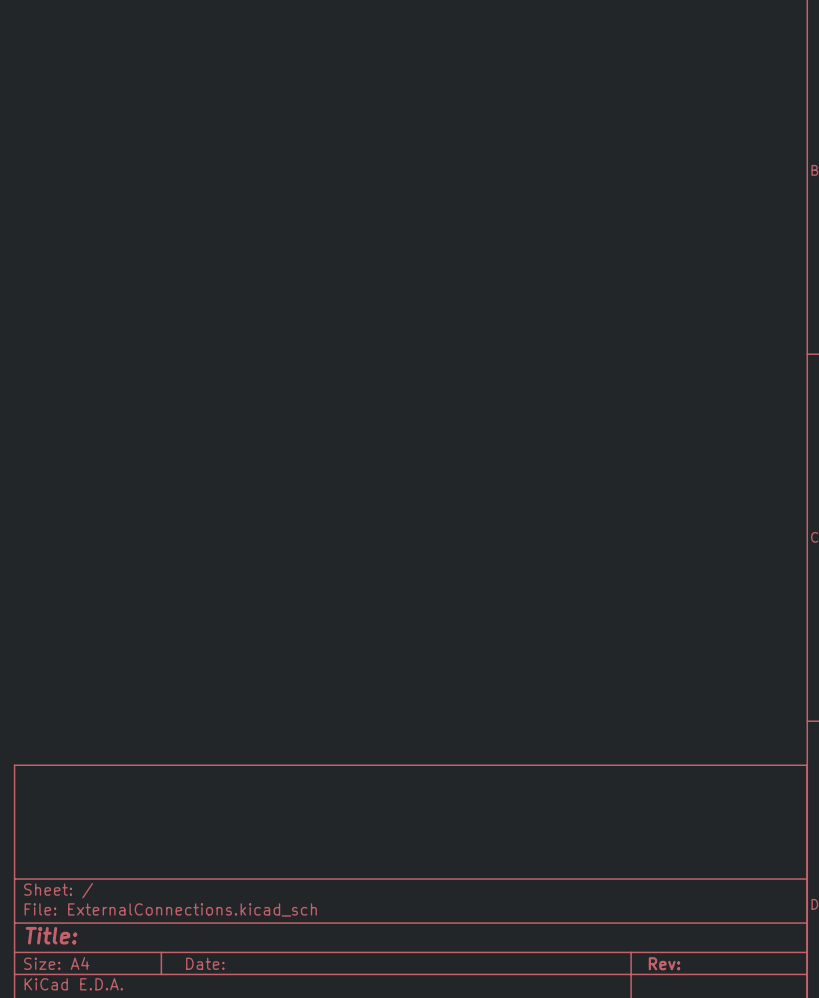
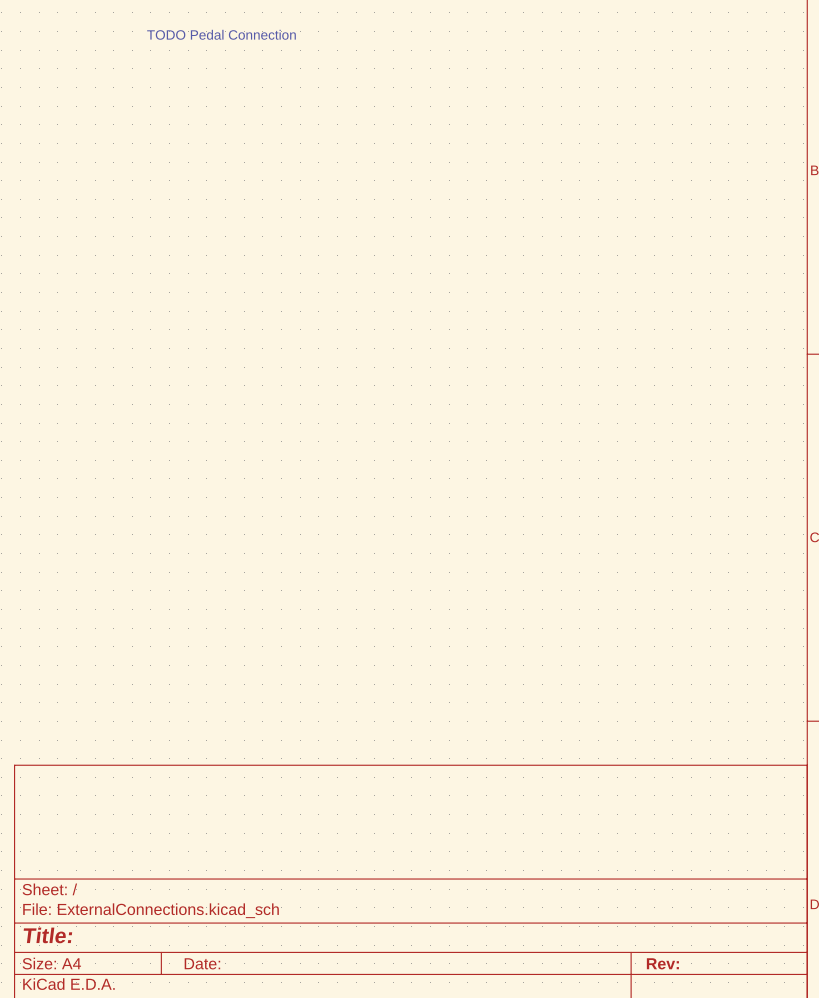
text: none -> TODO Pedal Connection (221, 34)

